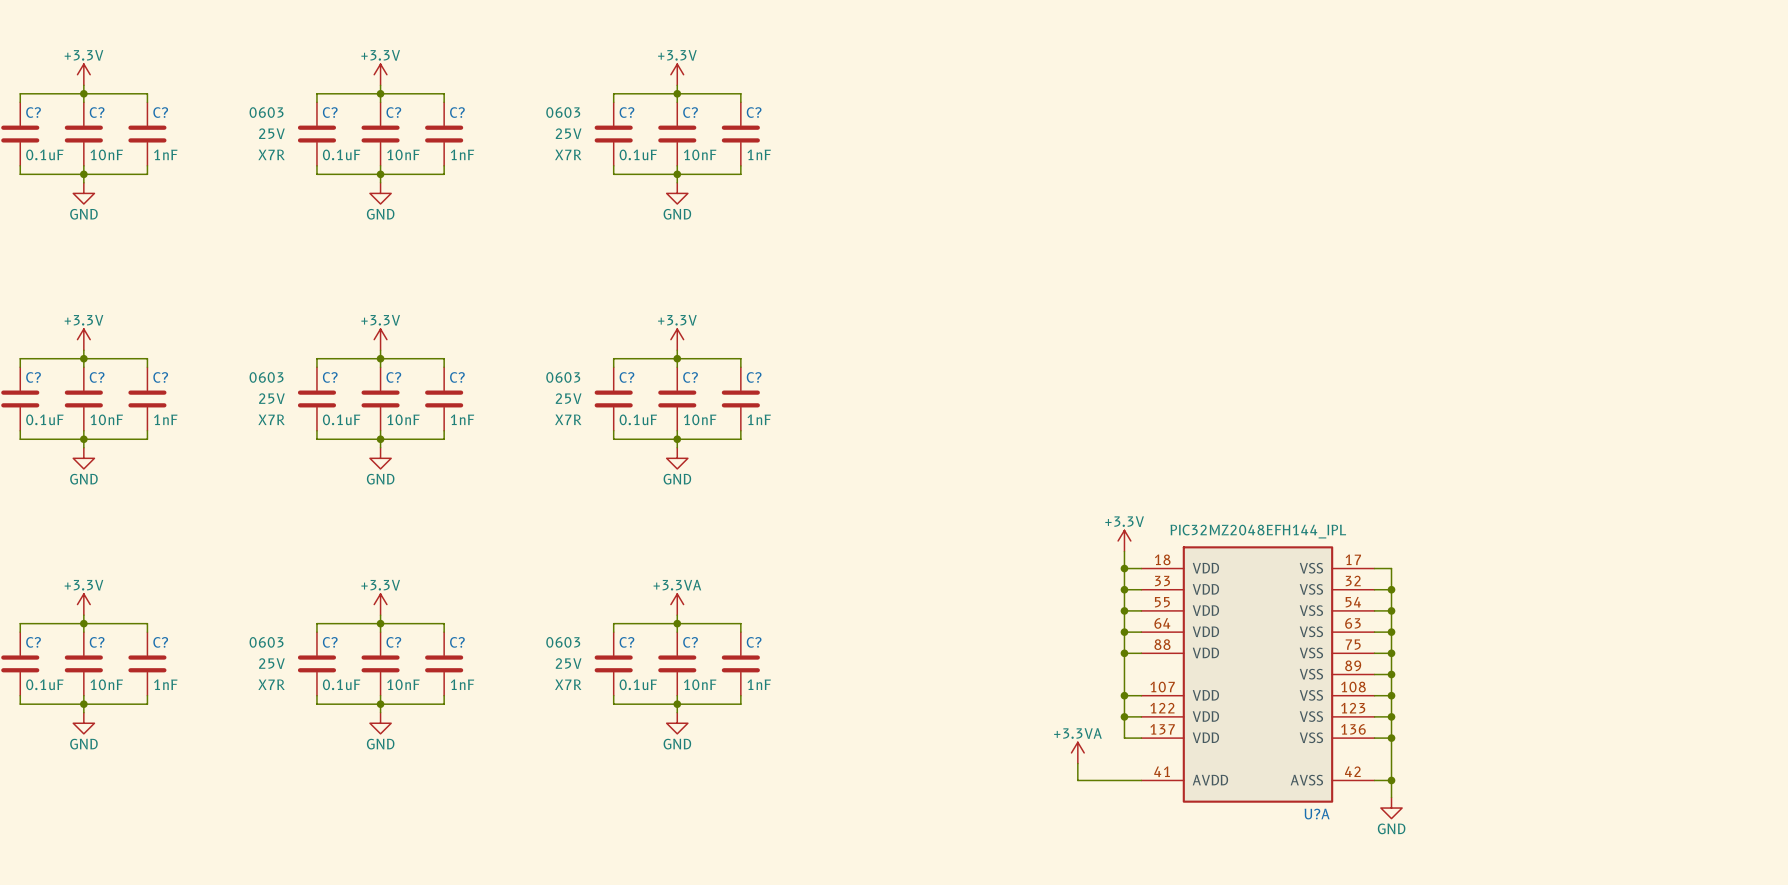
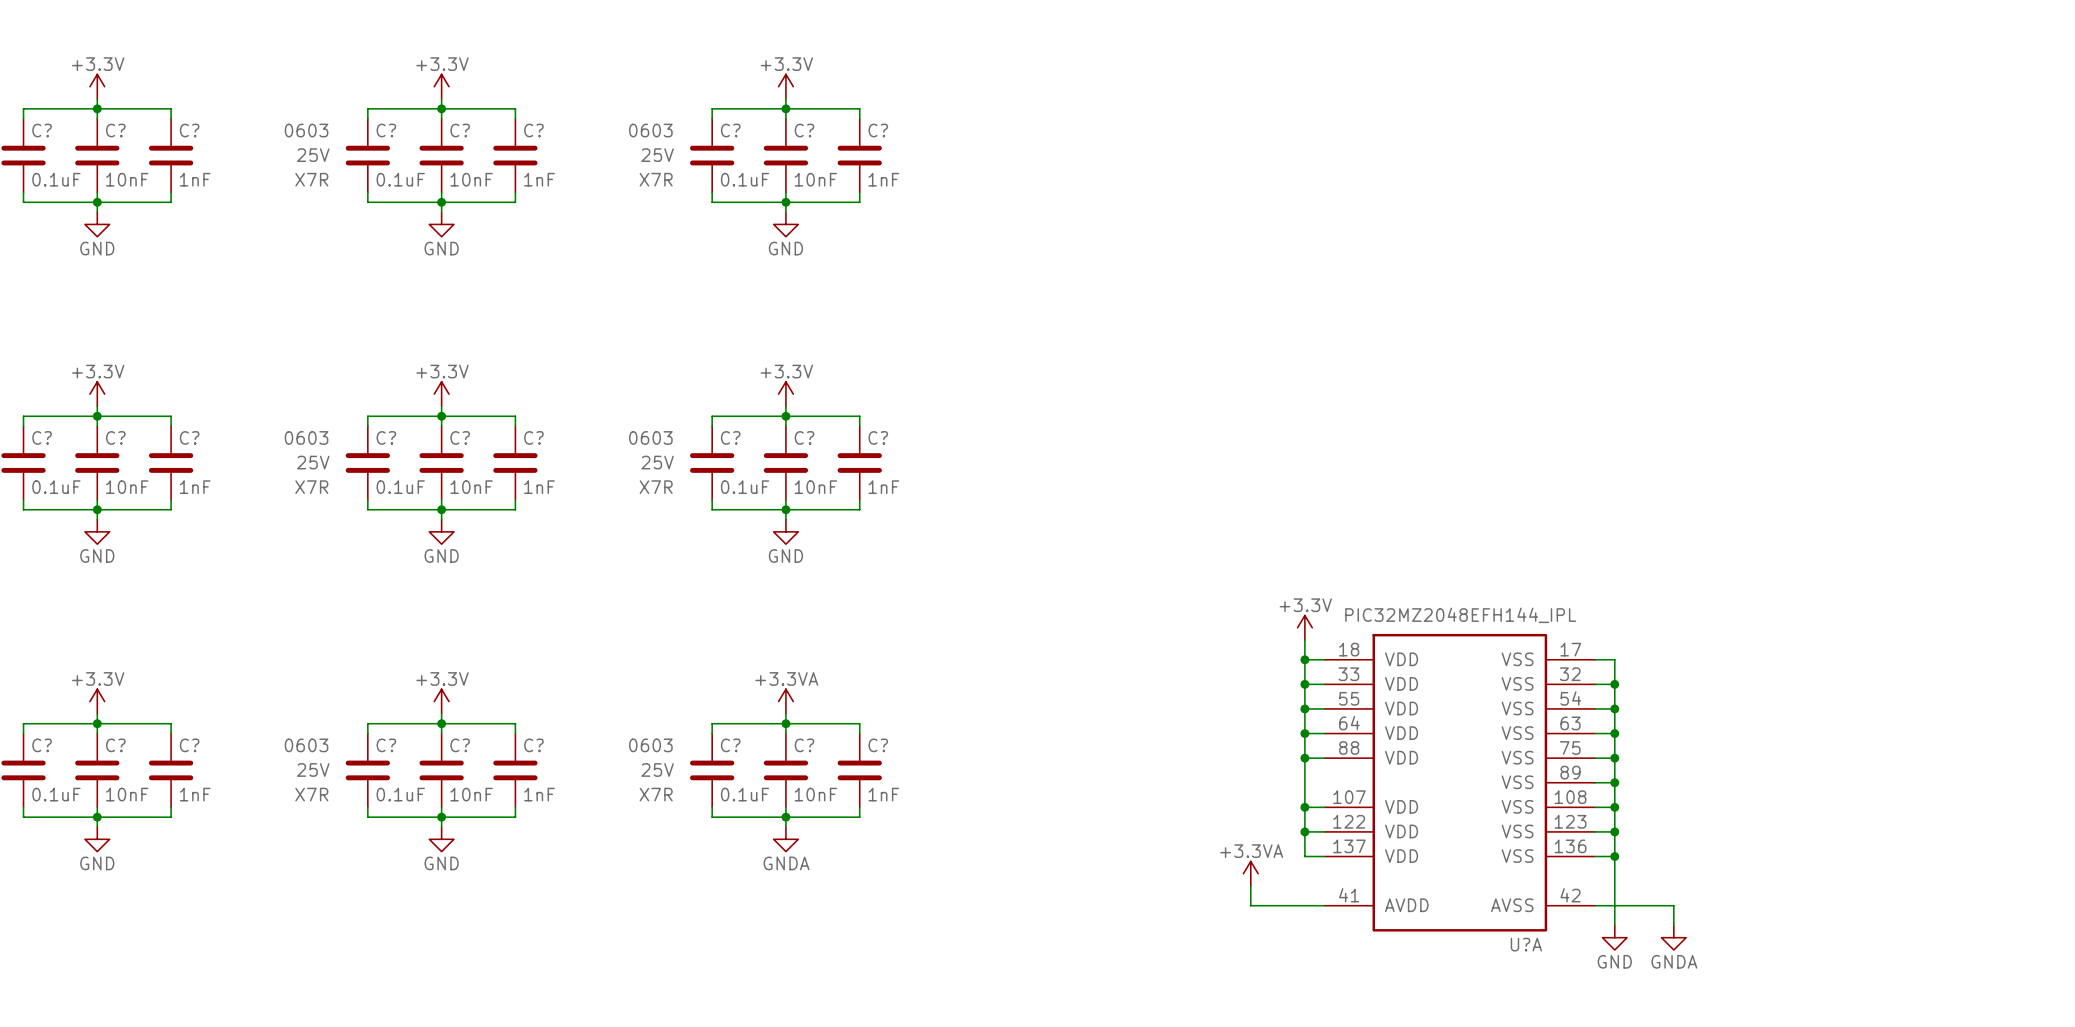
power symbol: GND (677, 723) -> GNDA (785, 839)
wire: none -> (1614, 905) (1673, 905) (1673, 925)
junction: (1391, 780) -> none
power symbol: none -> GNDA (1673, 937)

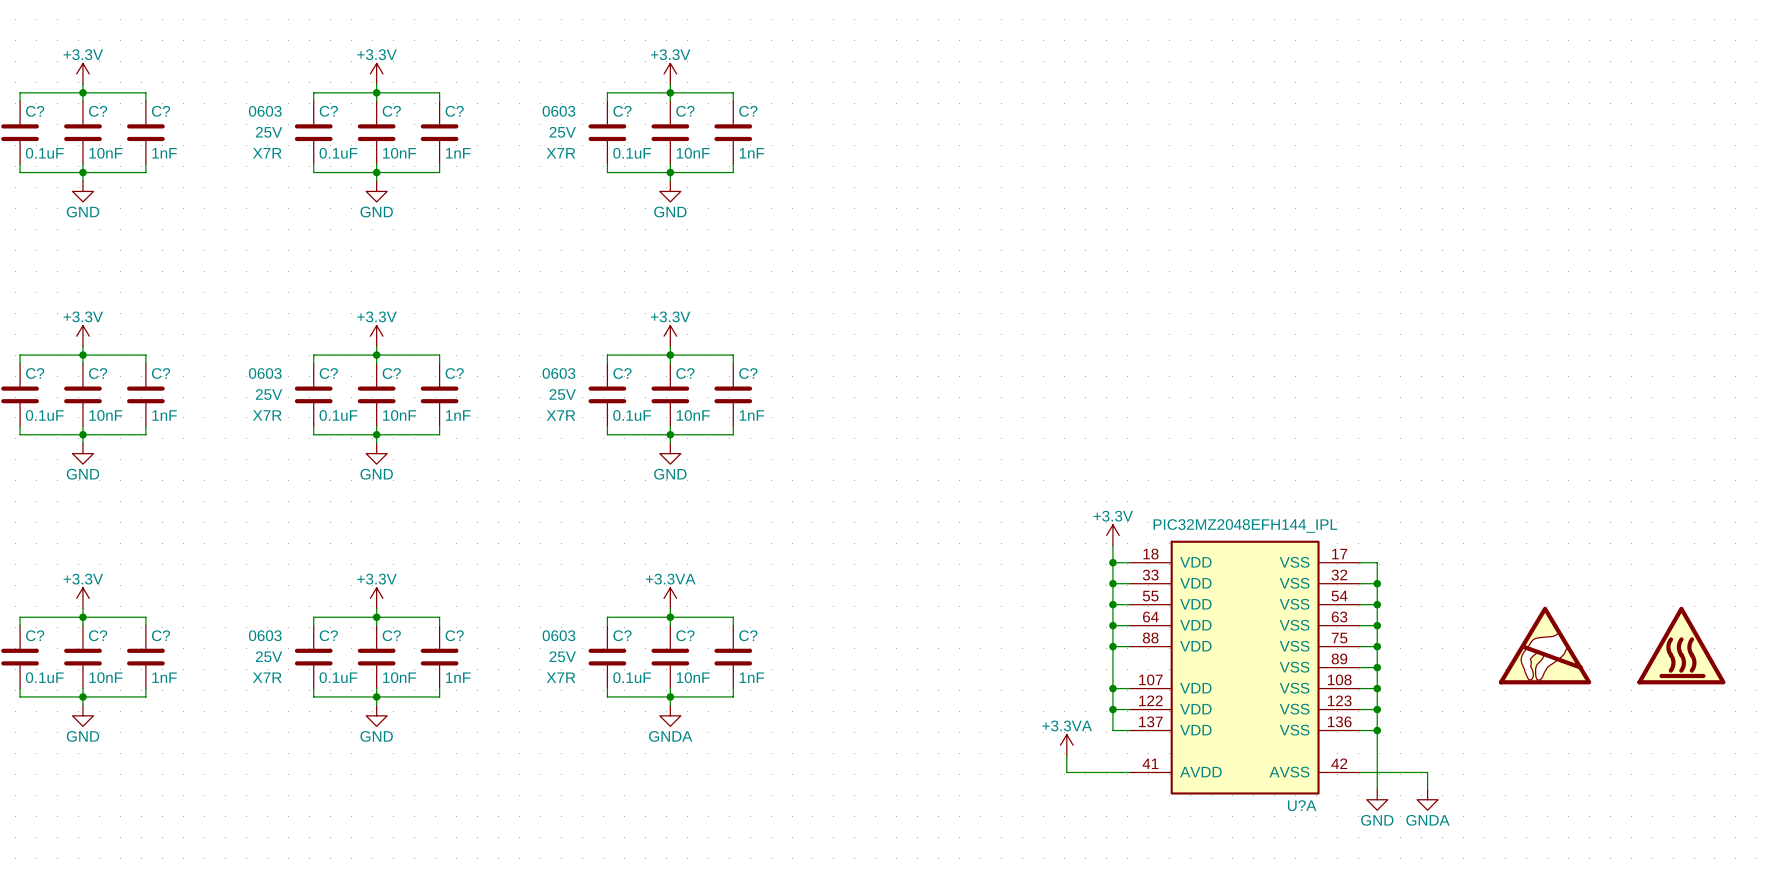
power symbol: none -> (1545, 645)
power symbol: none -> (1681, 645)

